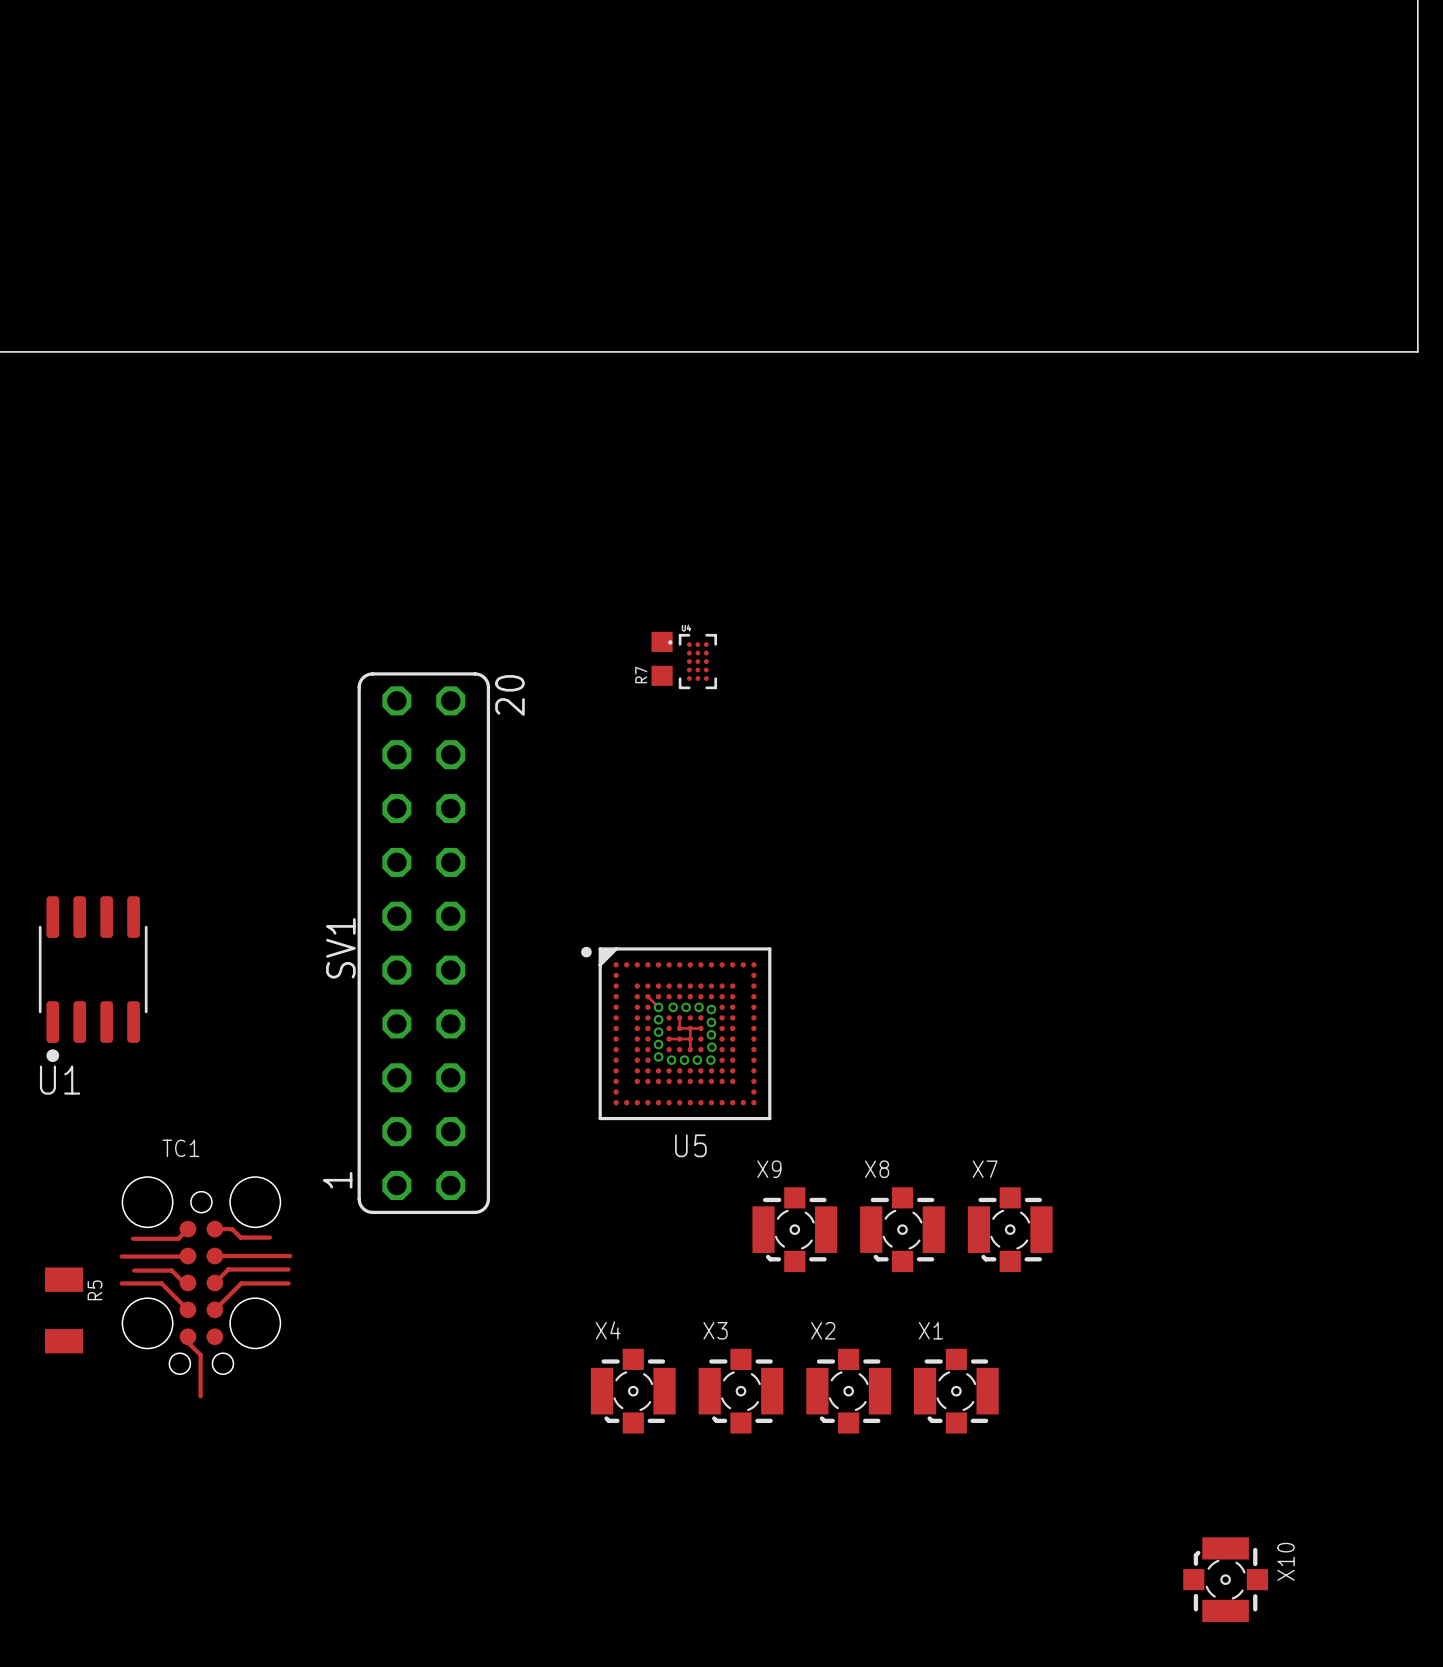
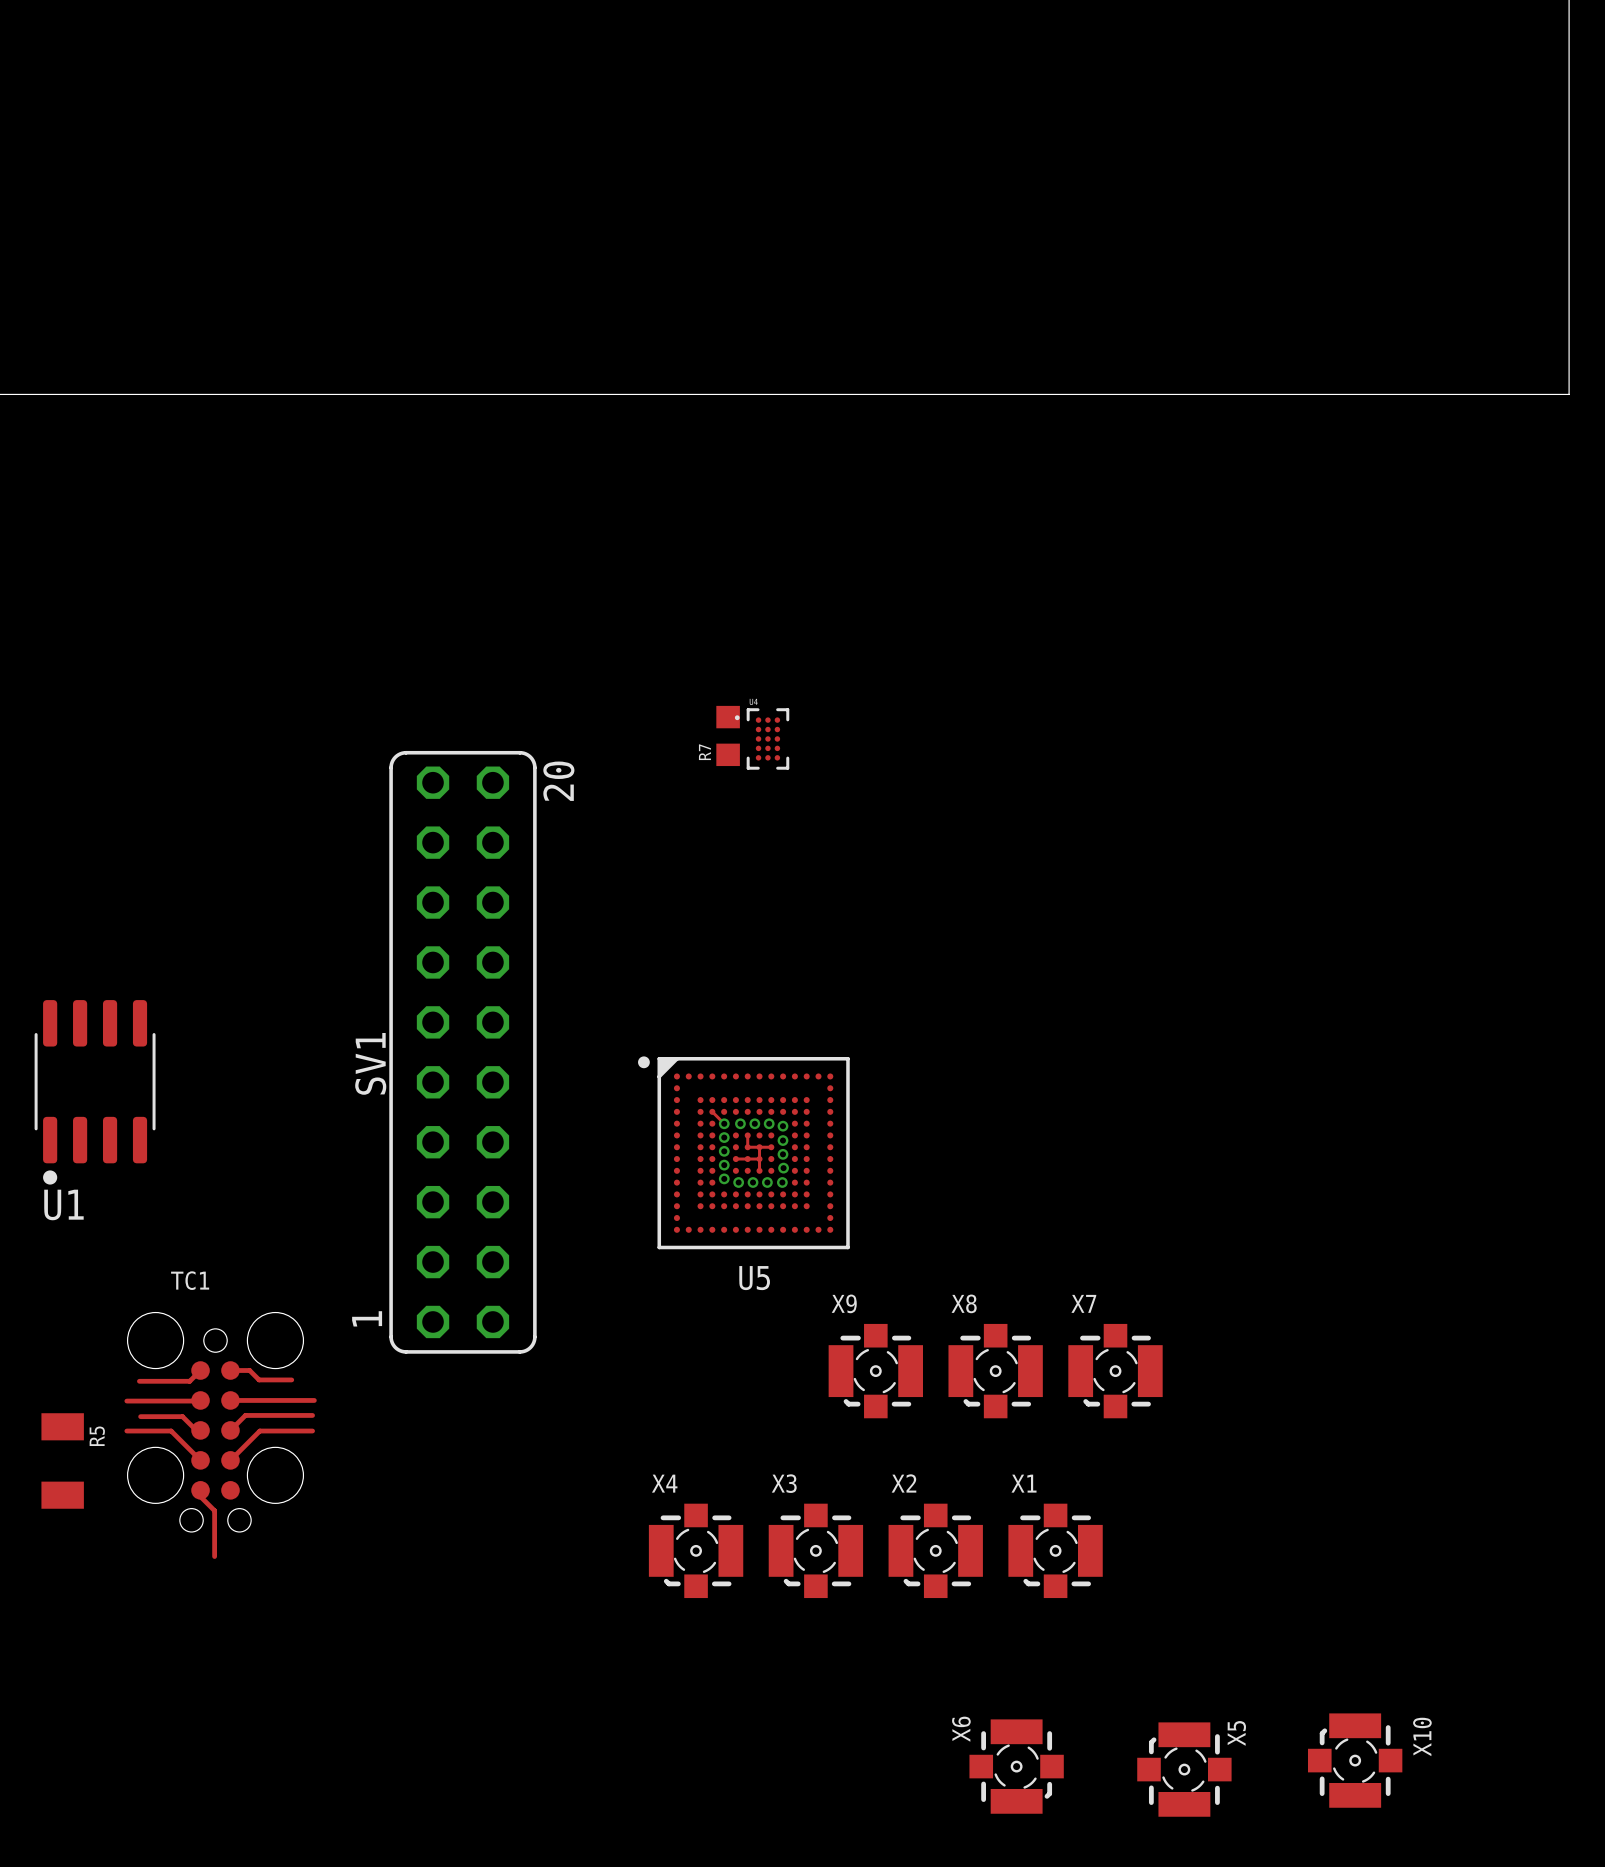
X6: none -> (1016, 1766)
X5: none -> (1184, 1769)

